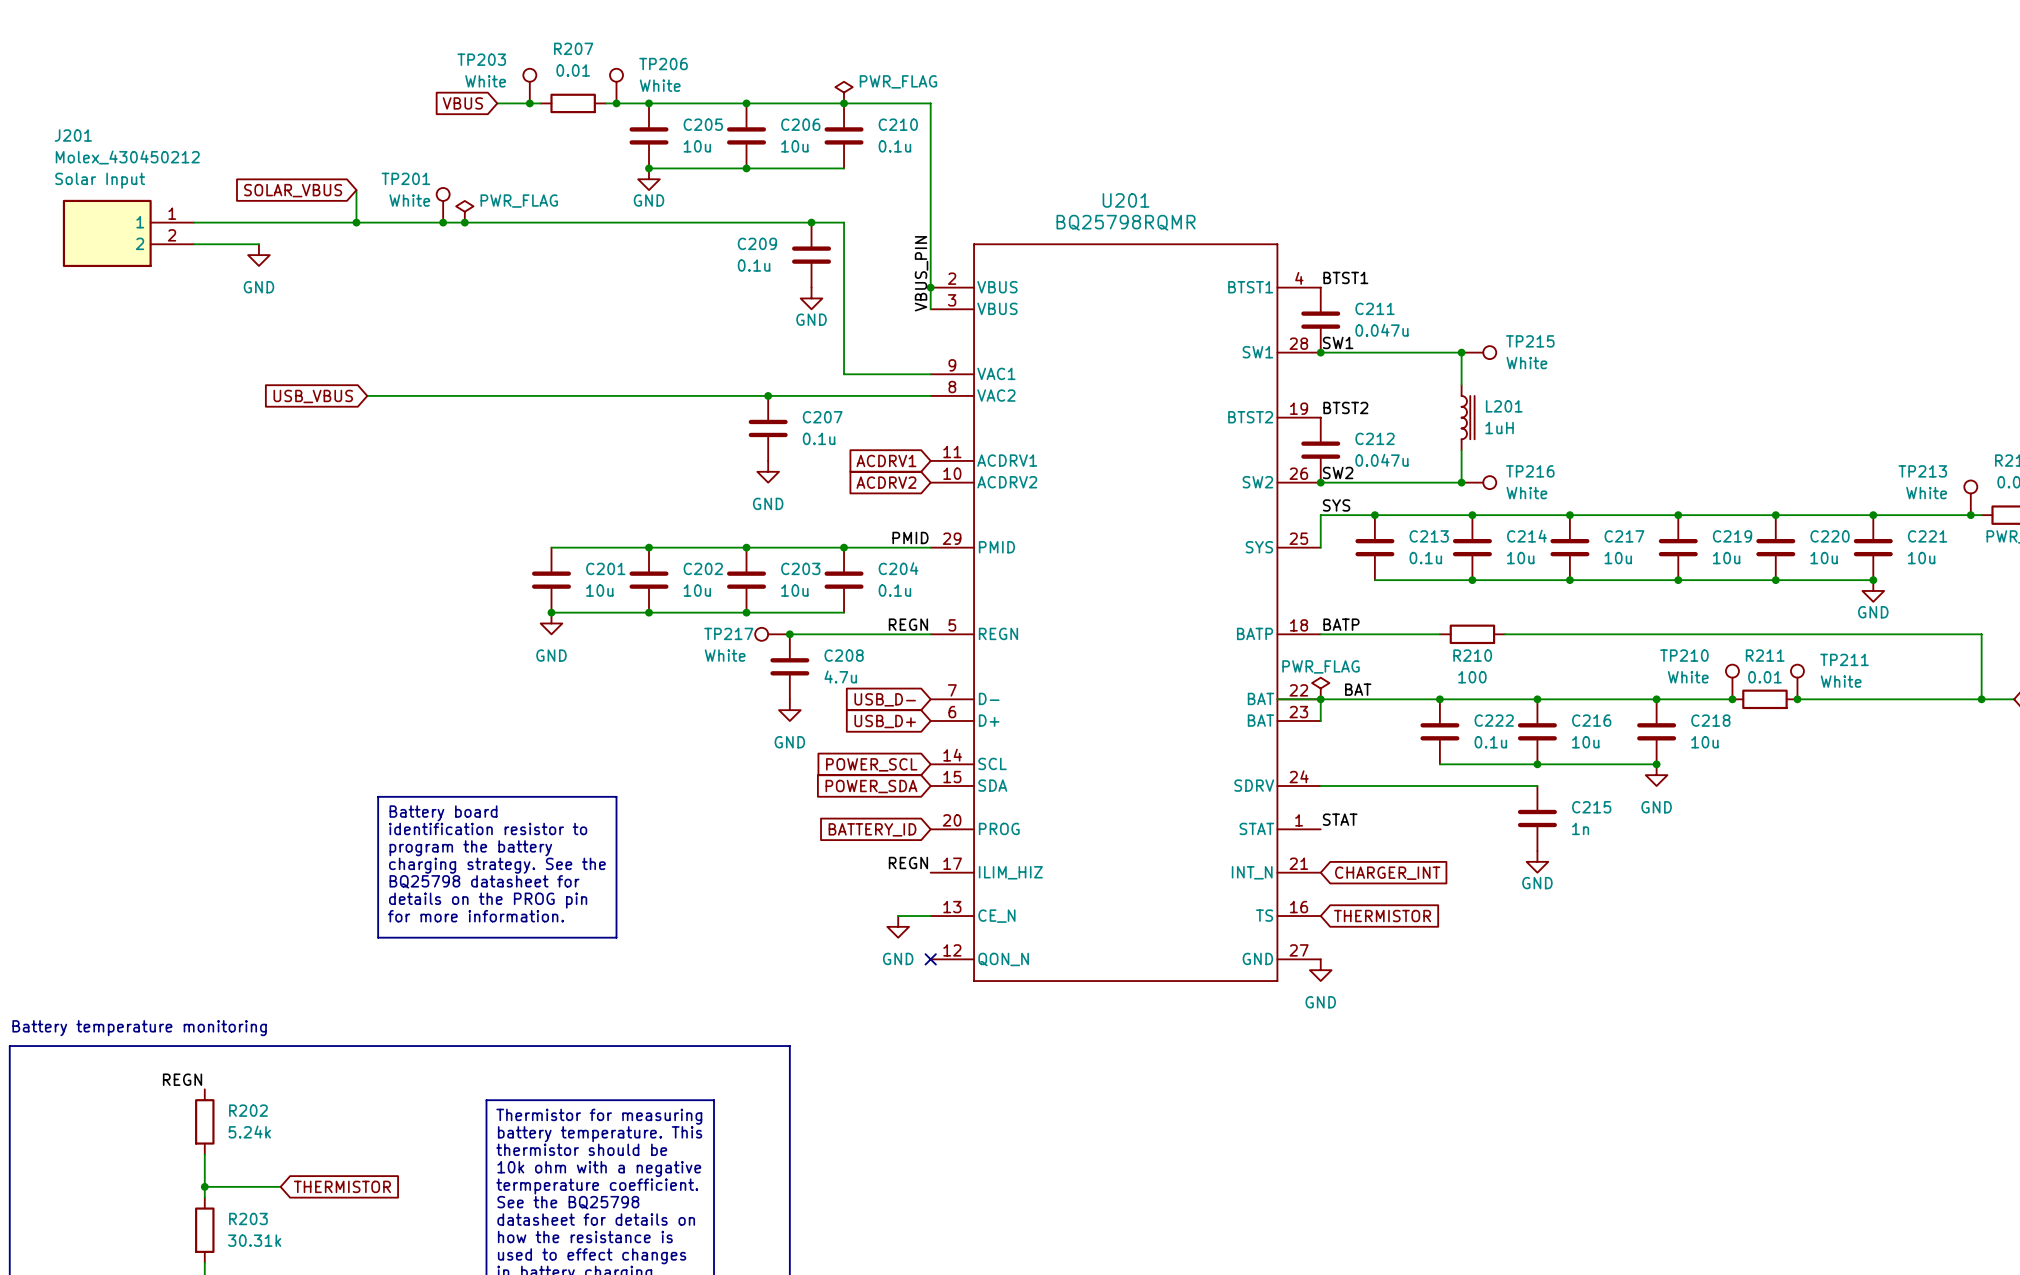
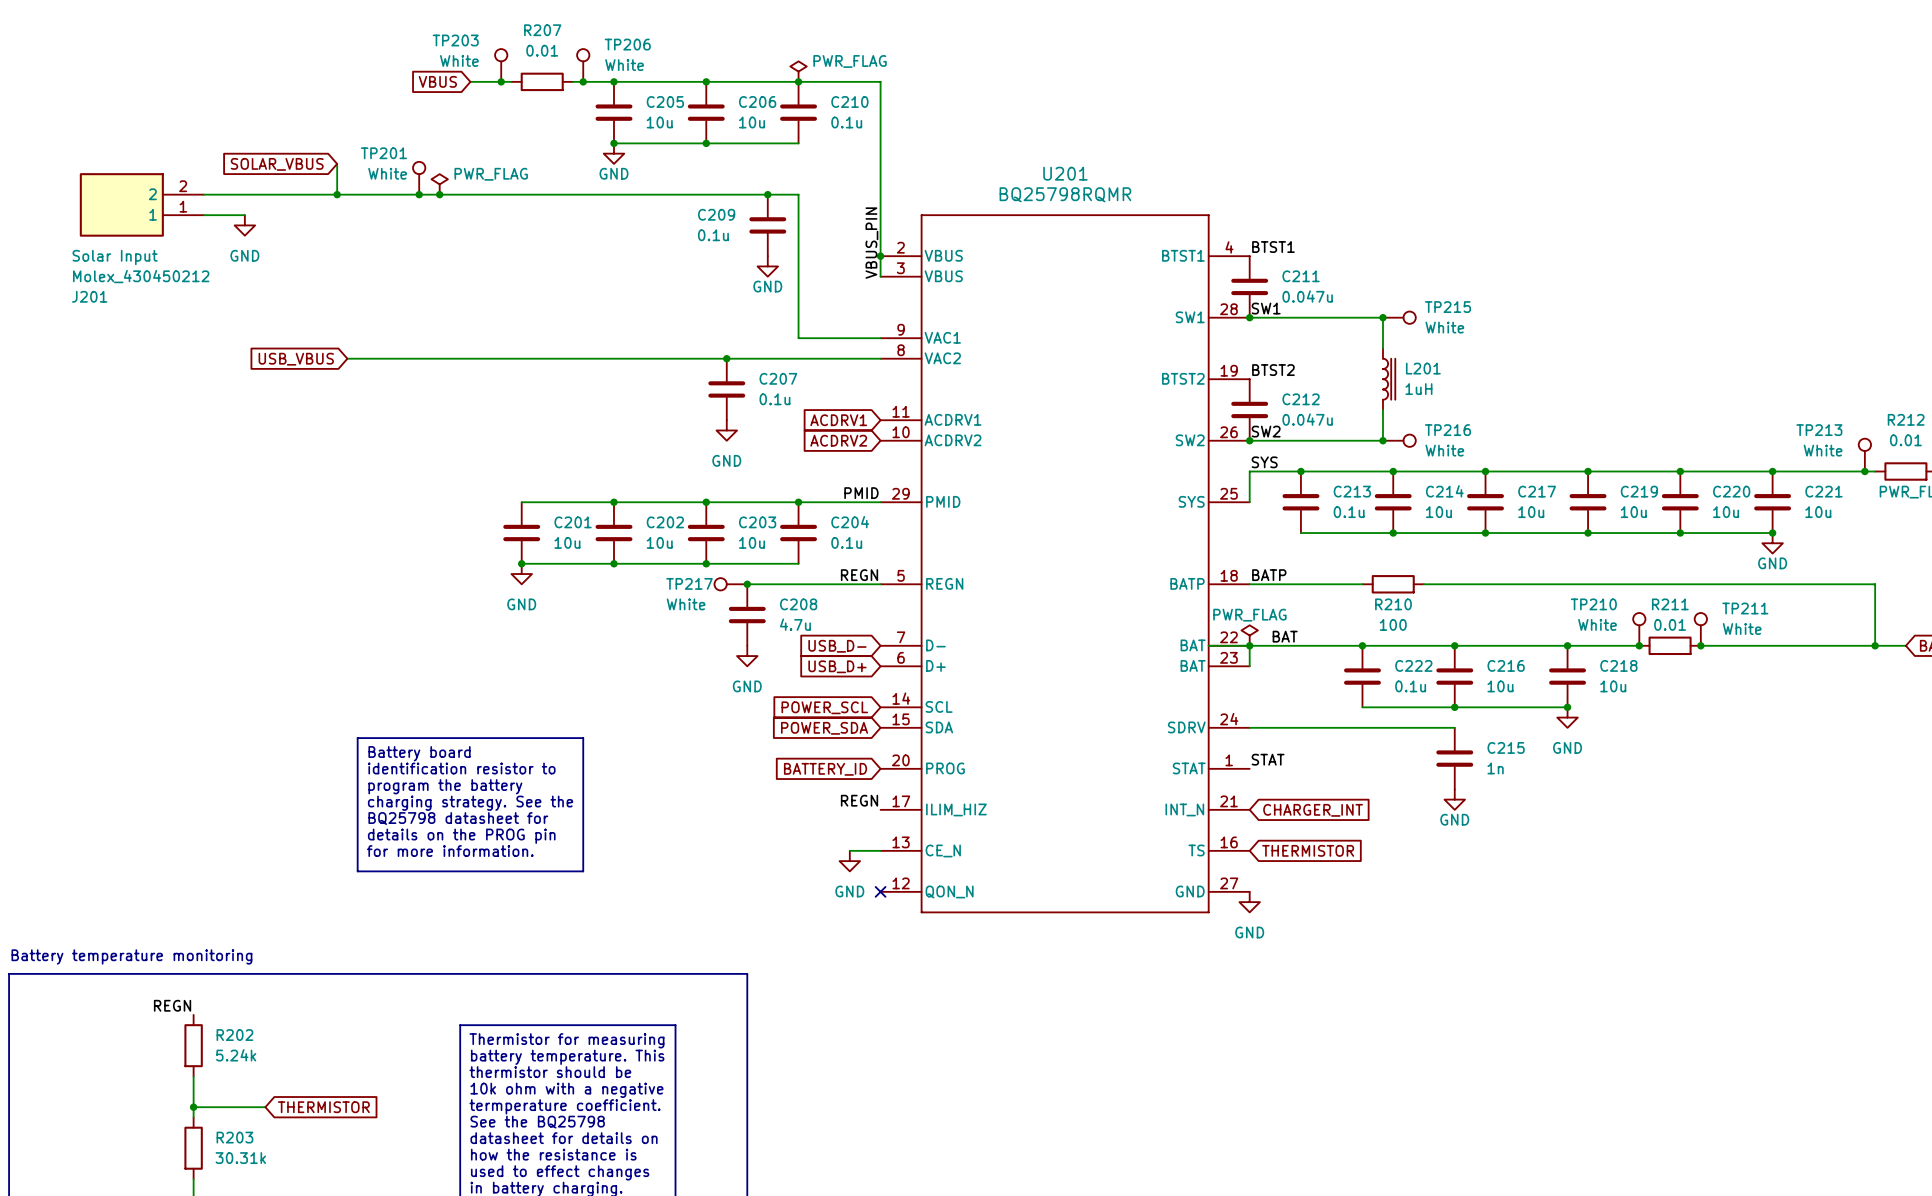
J201 flip: as is (107, 233) -> up-down (121, 204)

